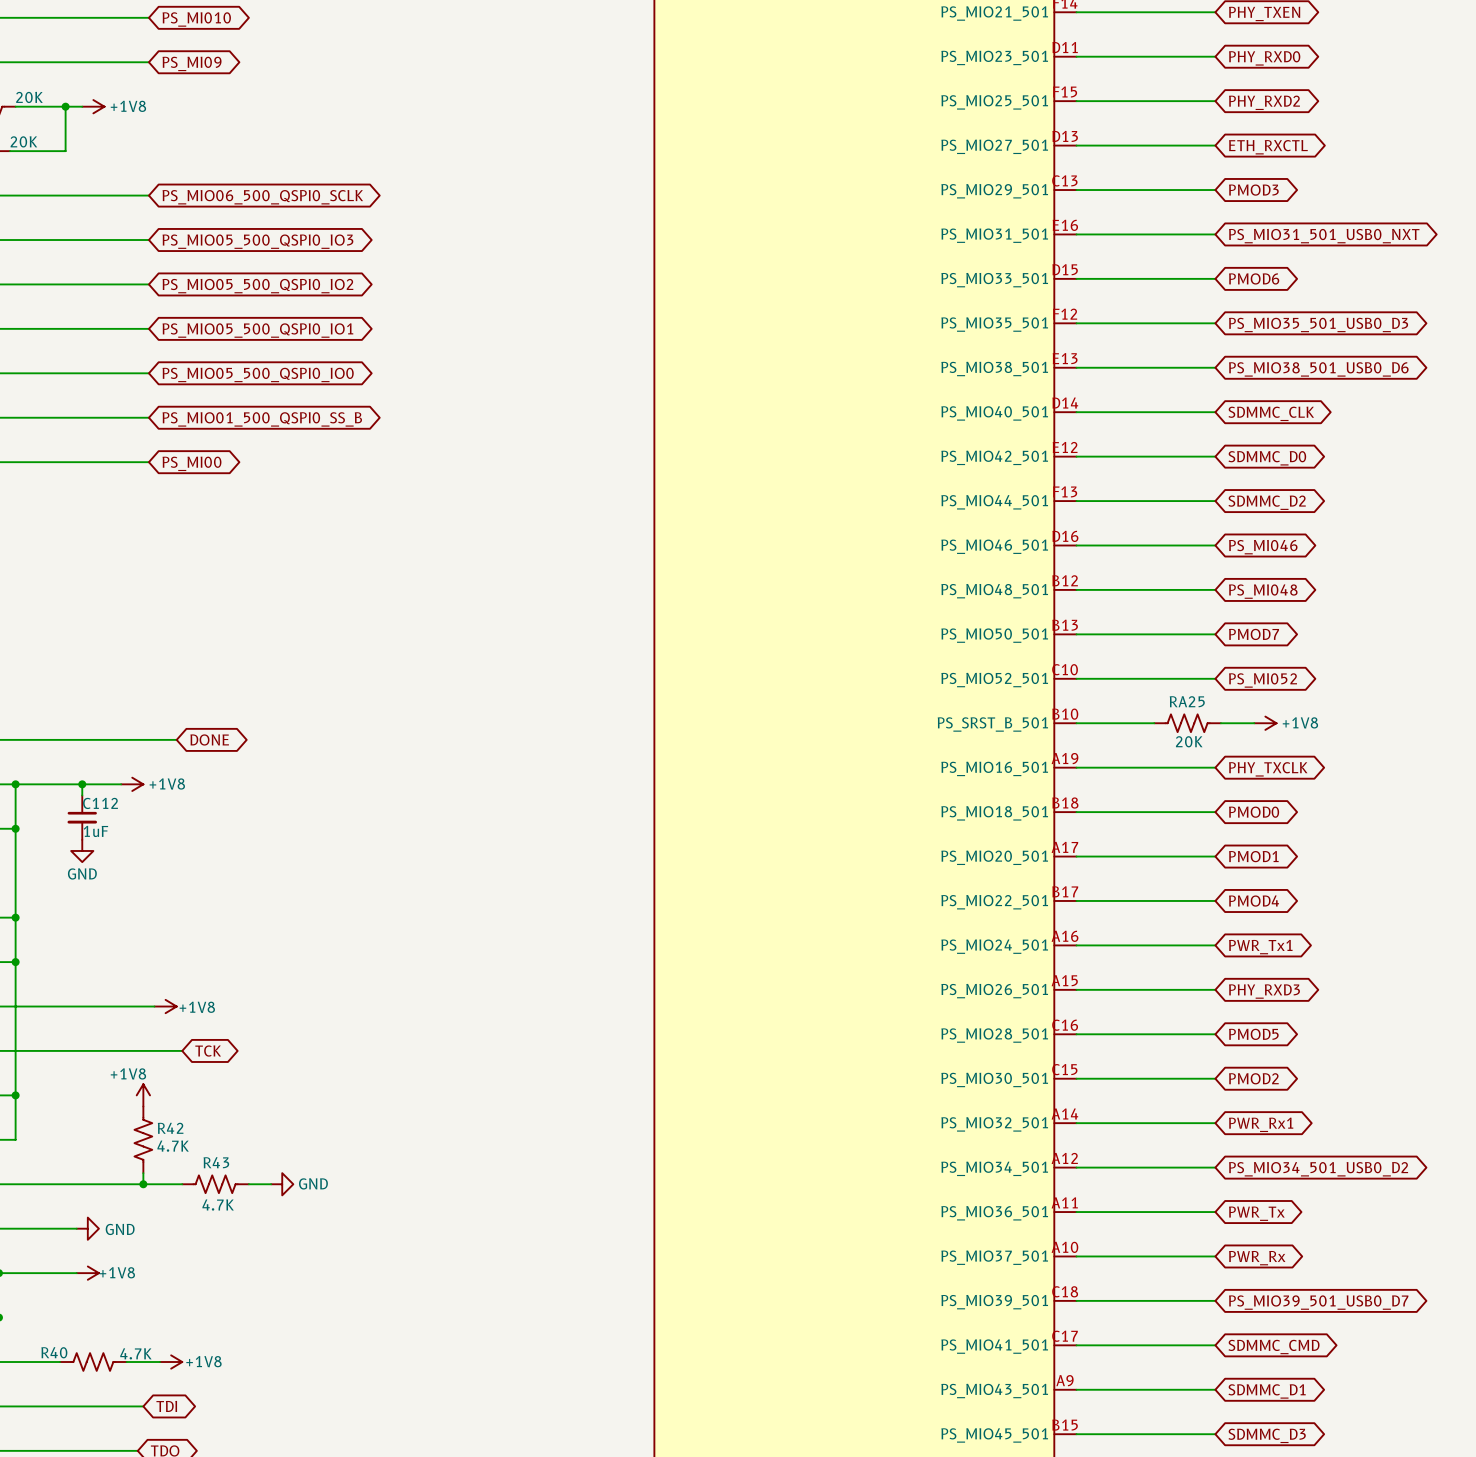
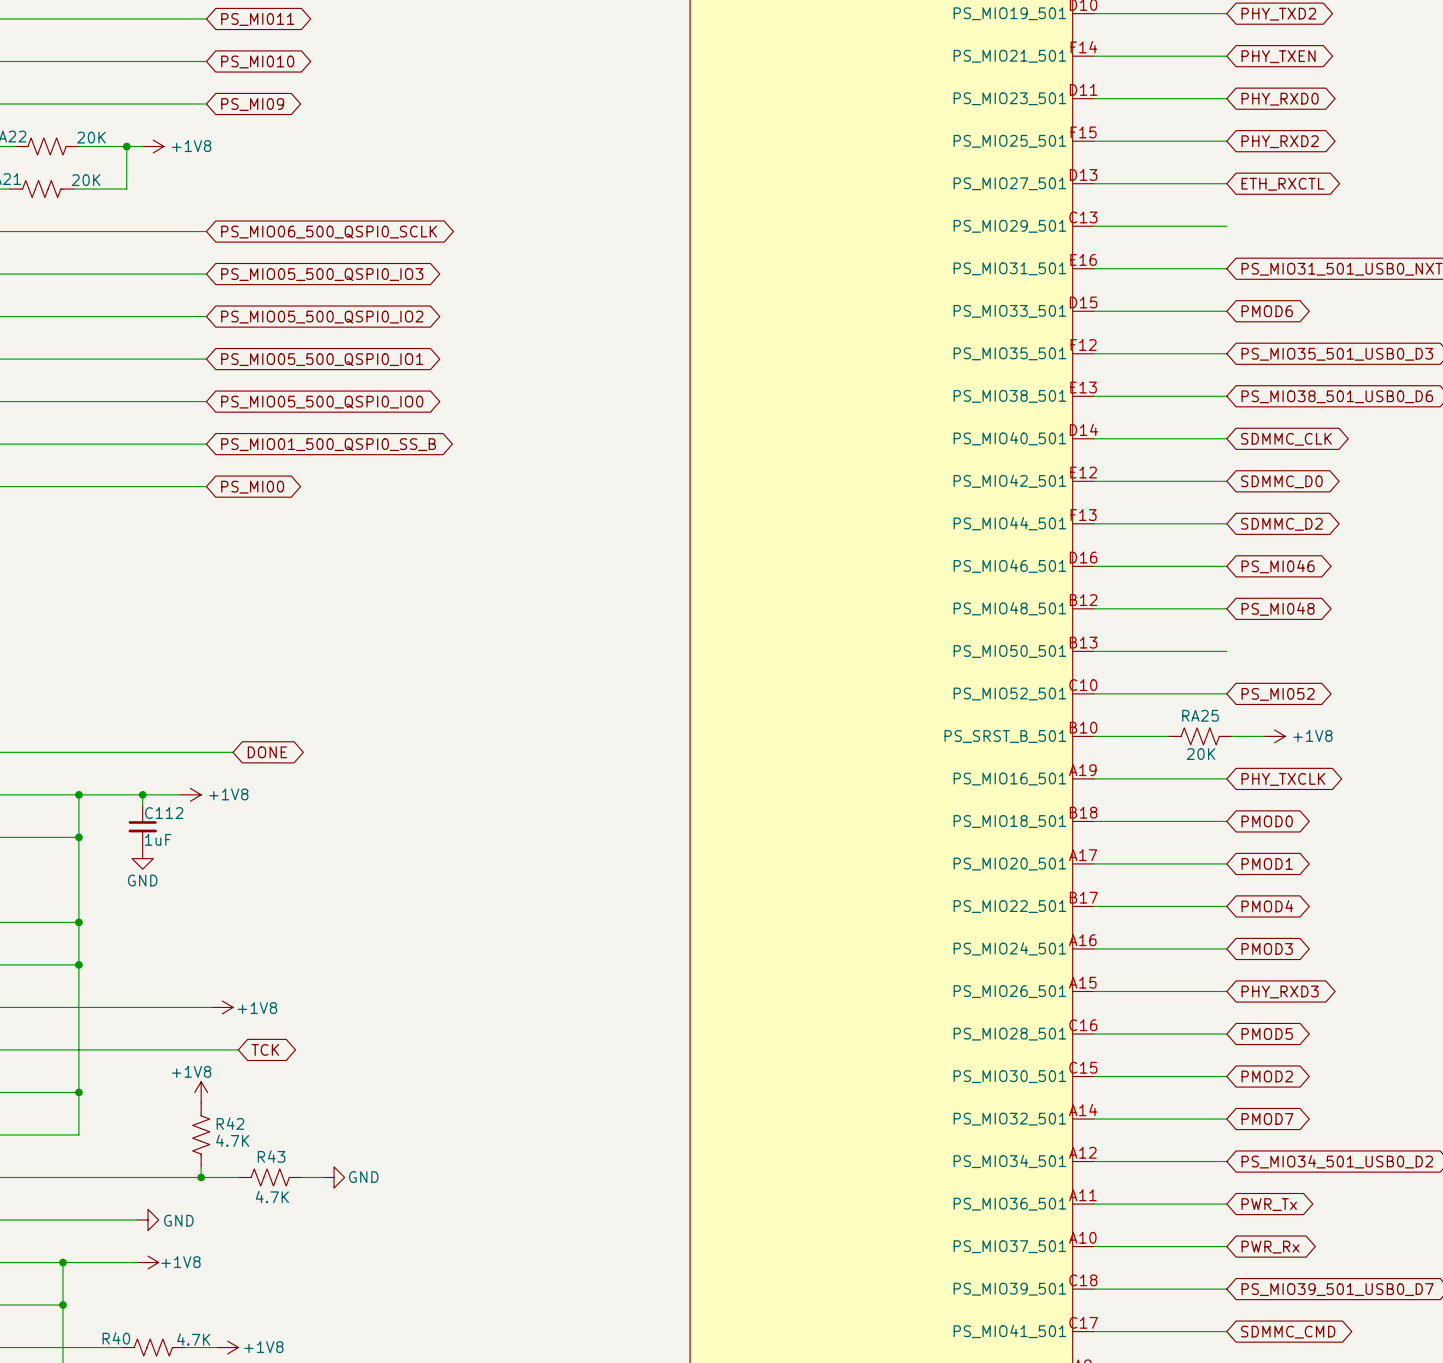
global label: PMOD3 (1253, 190) -> none
global label: PMOD7 (1254, 634) -> none
global label: PWR_Tx1 (1260, 947) -> PMOD3 (1267, 948)
global label: PWR_Rx1 (1261, 1124) -> PMOD7 (1267, 1119)

